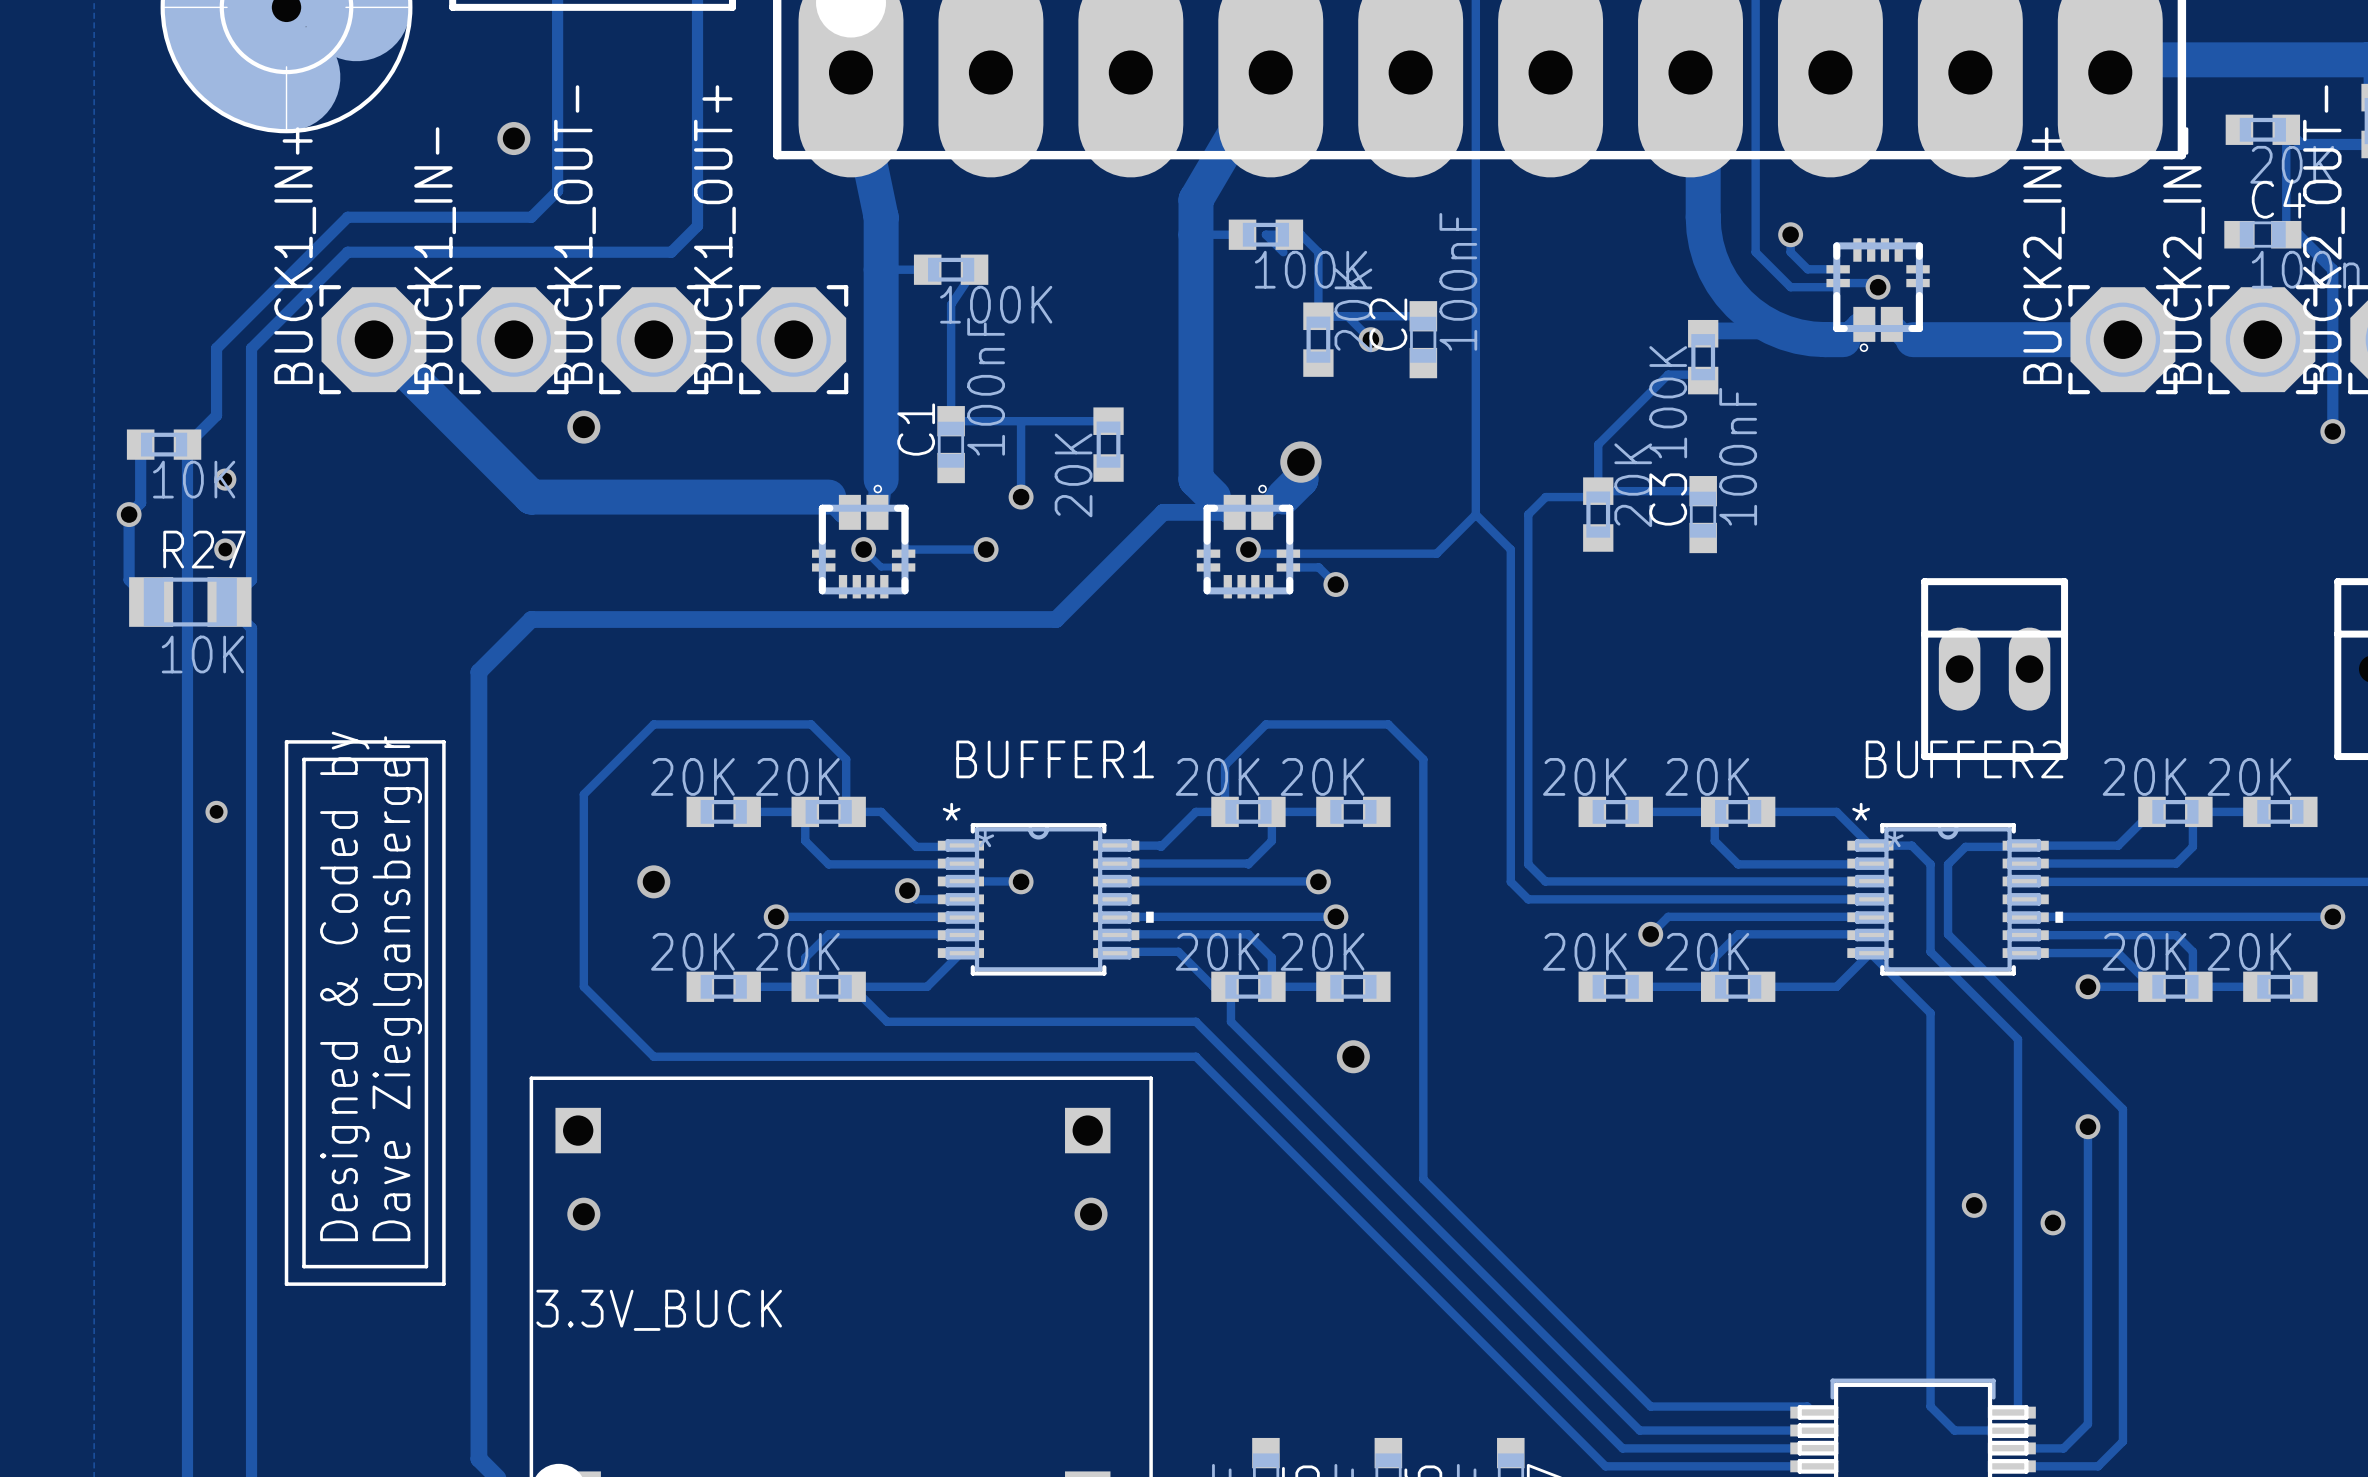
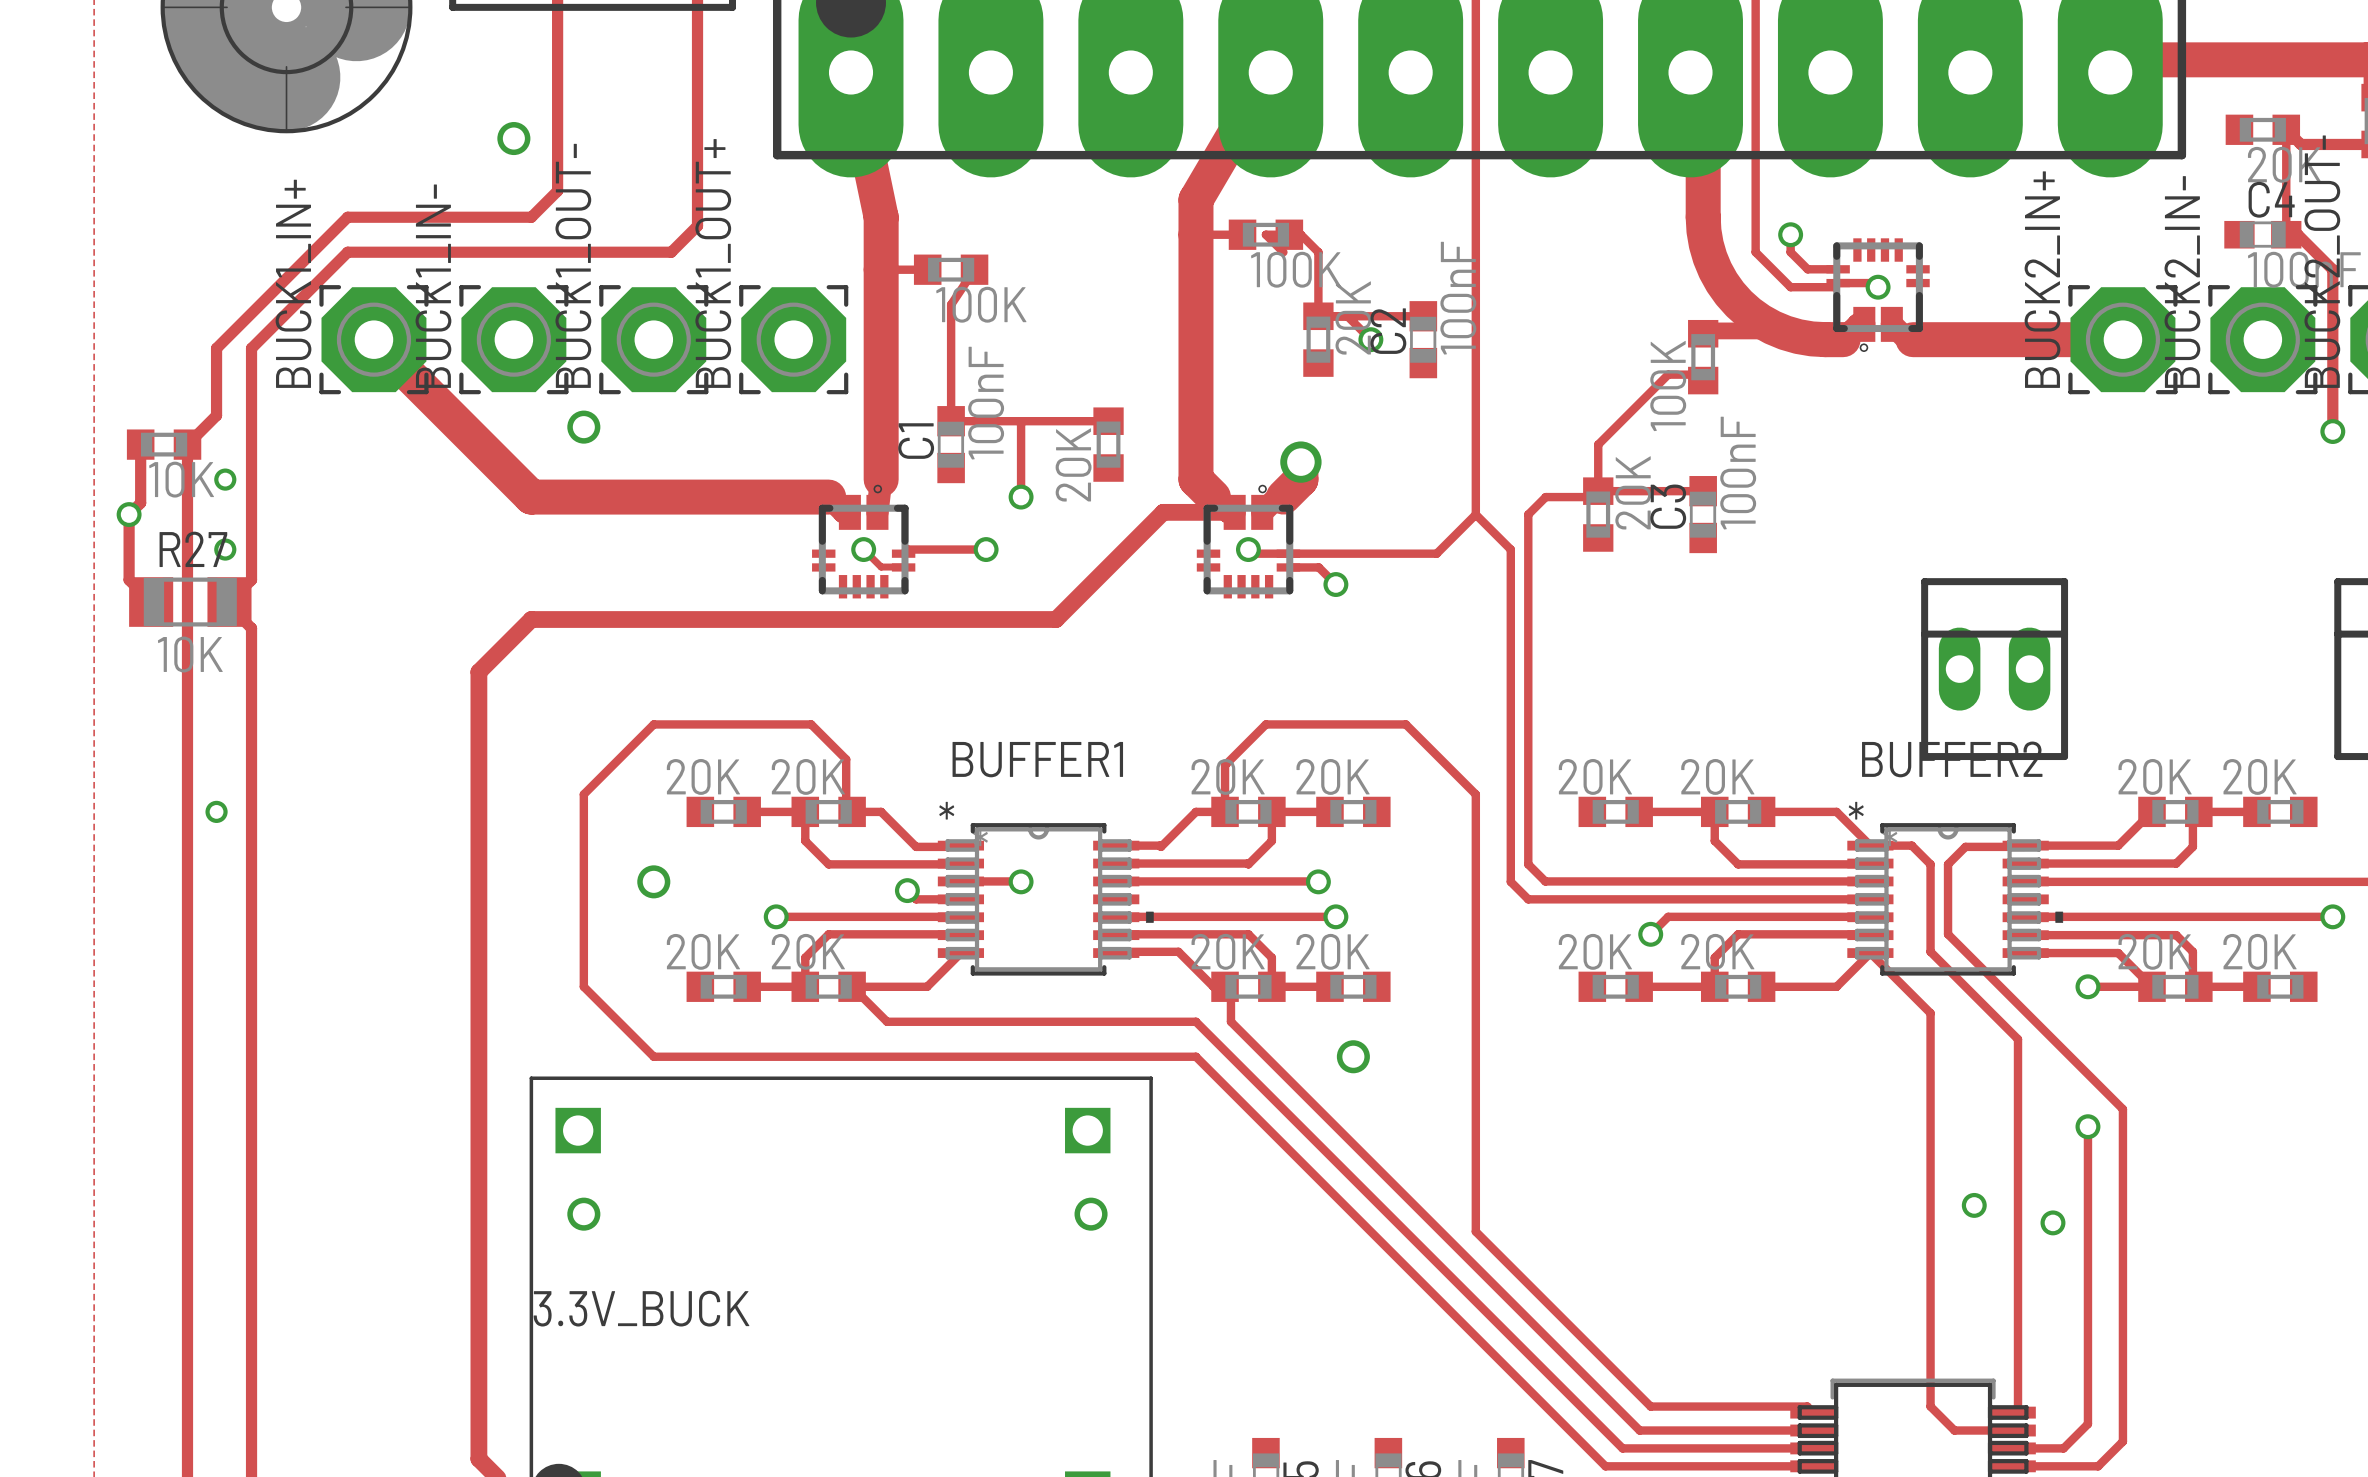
track: (1388, 724) (1423, 759) (1423, 1179) (1475, 1231) -> (1388, 724) (1405, 724) (1475, 794) (1475, 1231)
drawing: [284, 740, 446, 1286] -> none

